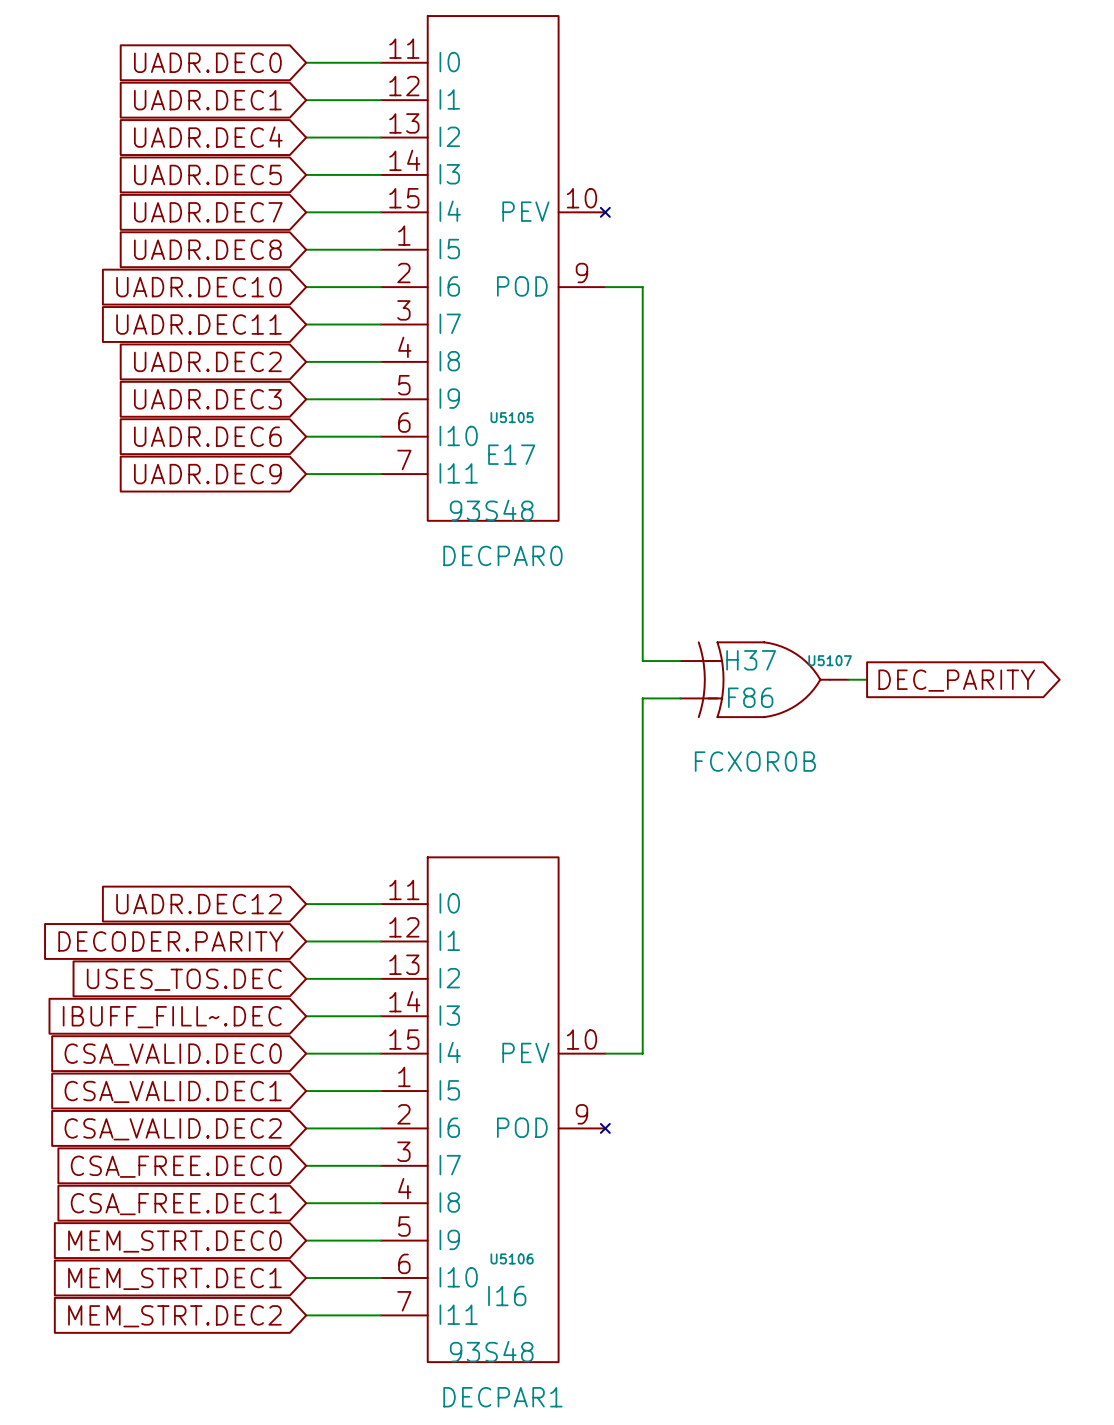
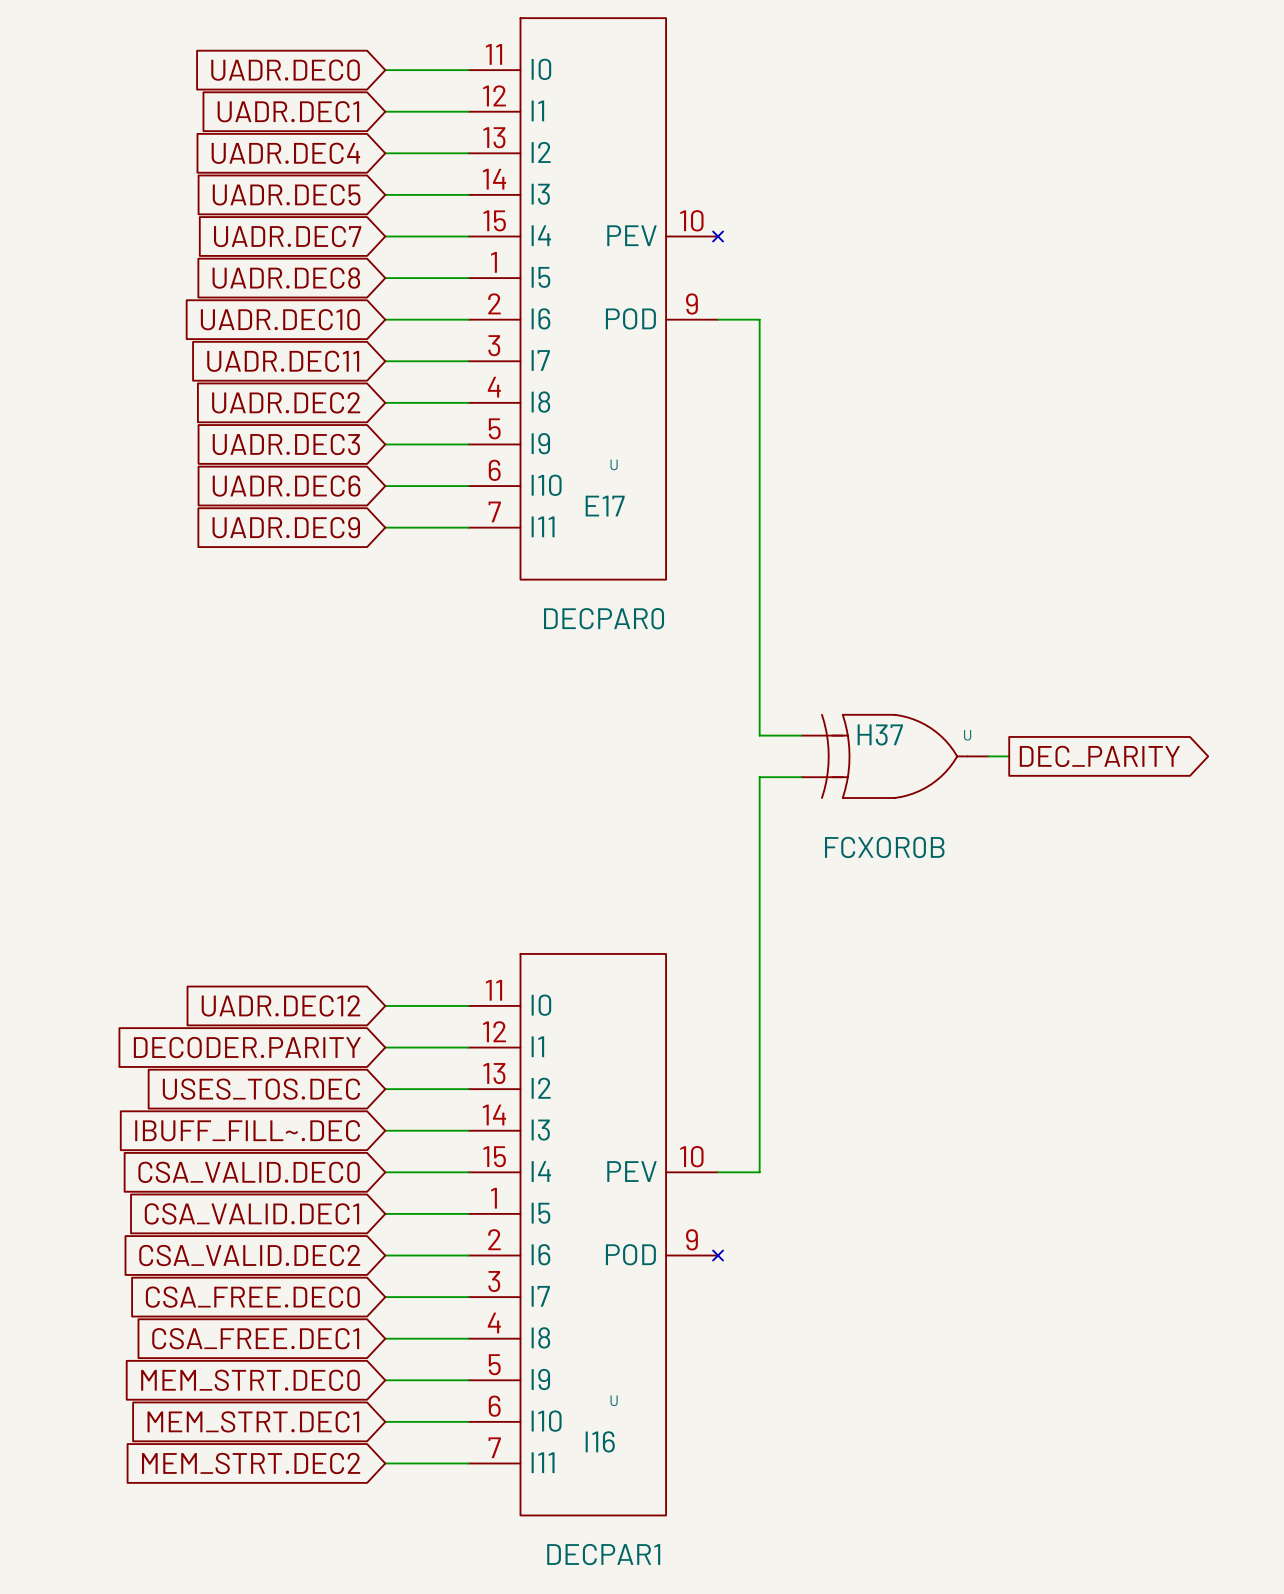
U5105 name: U5105 (512, 417) -> U (614, 464)
U5105 value: 93S48 (491, 510) -> none
U5107 name: U5107 (830, 660) -> U (967, 735)
U5107 value: F86 (750, 697) -> none
U5106 name: U5106 (512, 1258) -> U (614, 1400)
U5106 value: 93S48 (491, 1351) -> none

